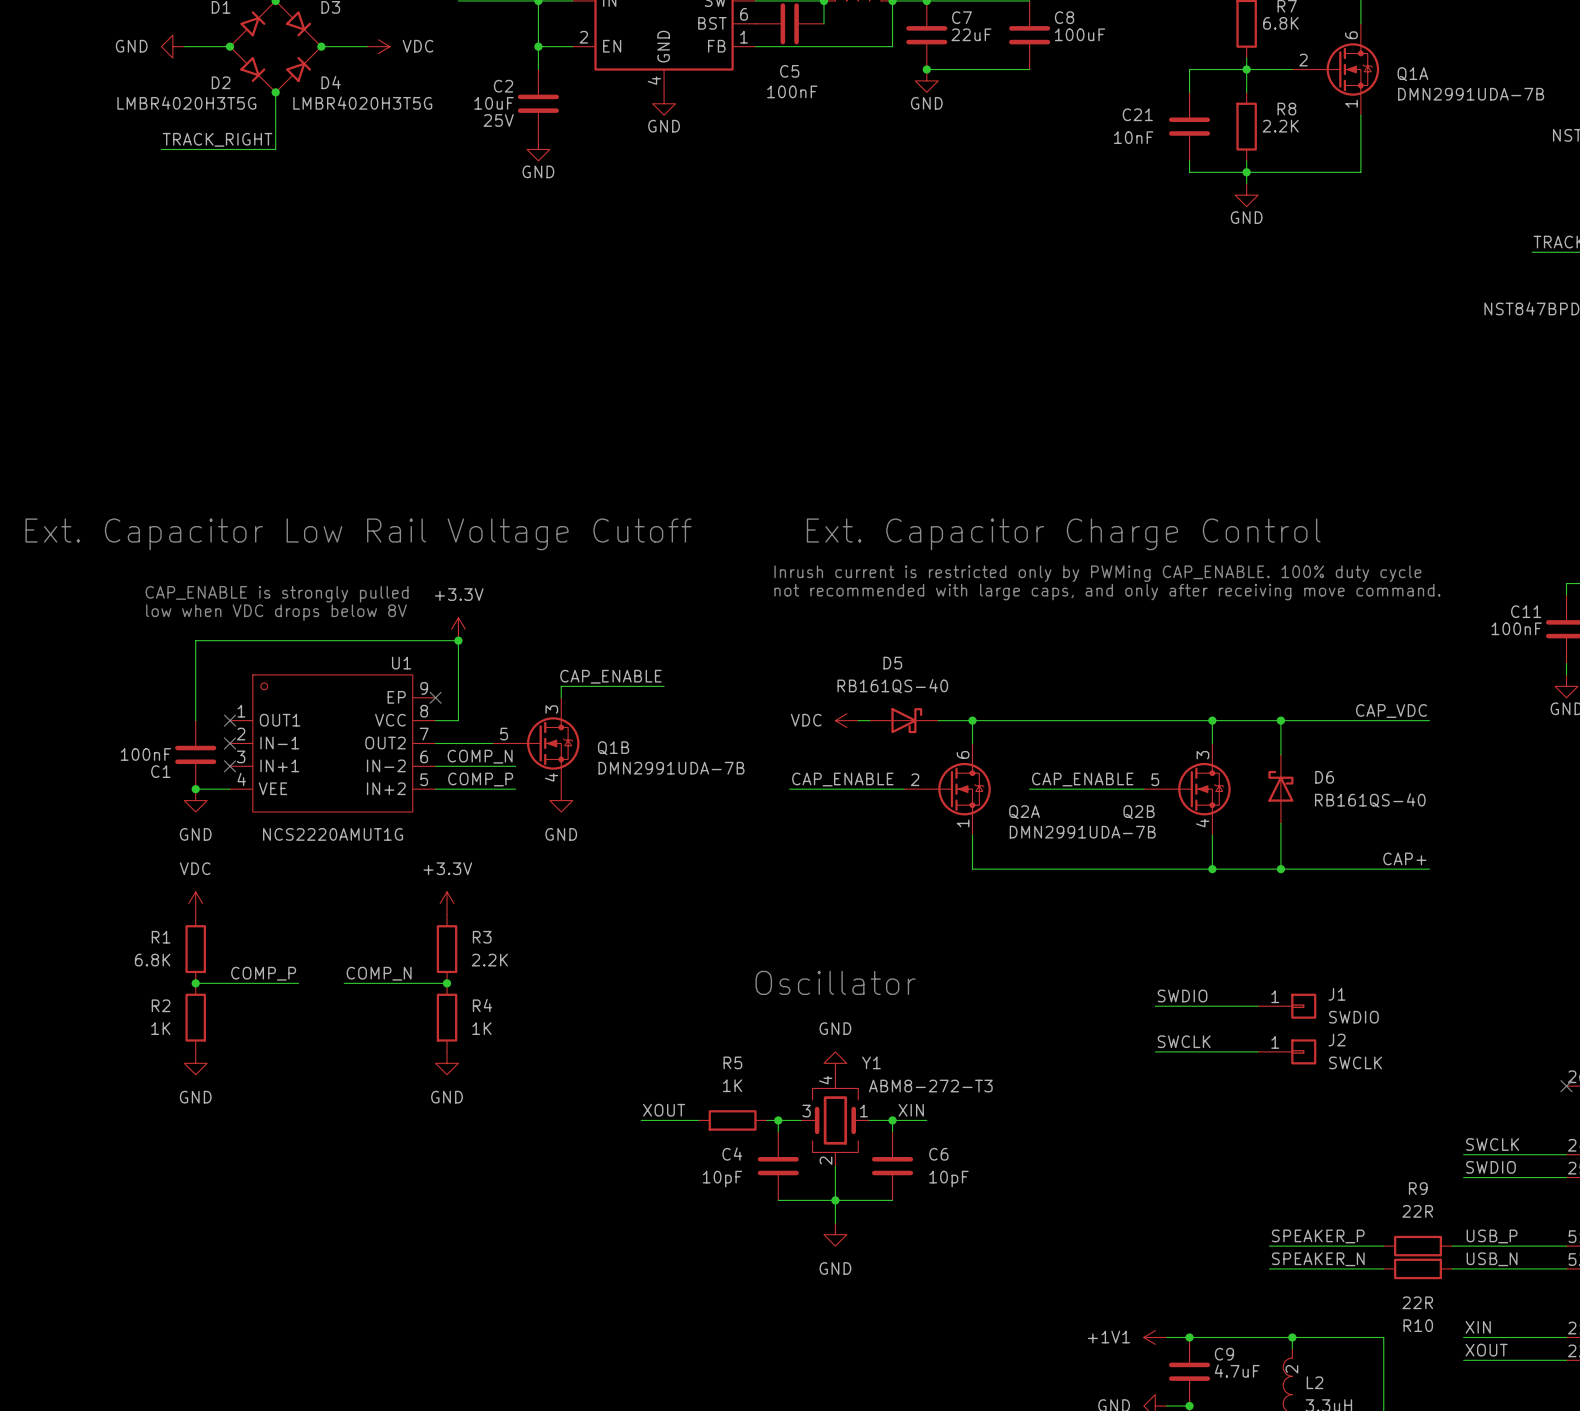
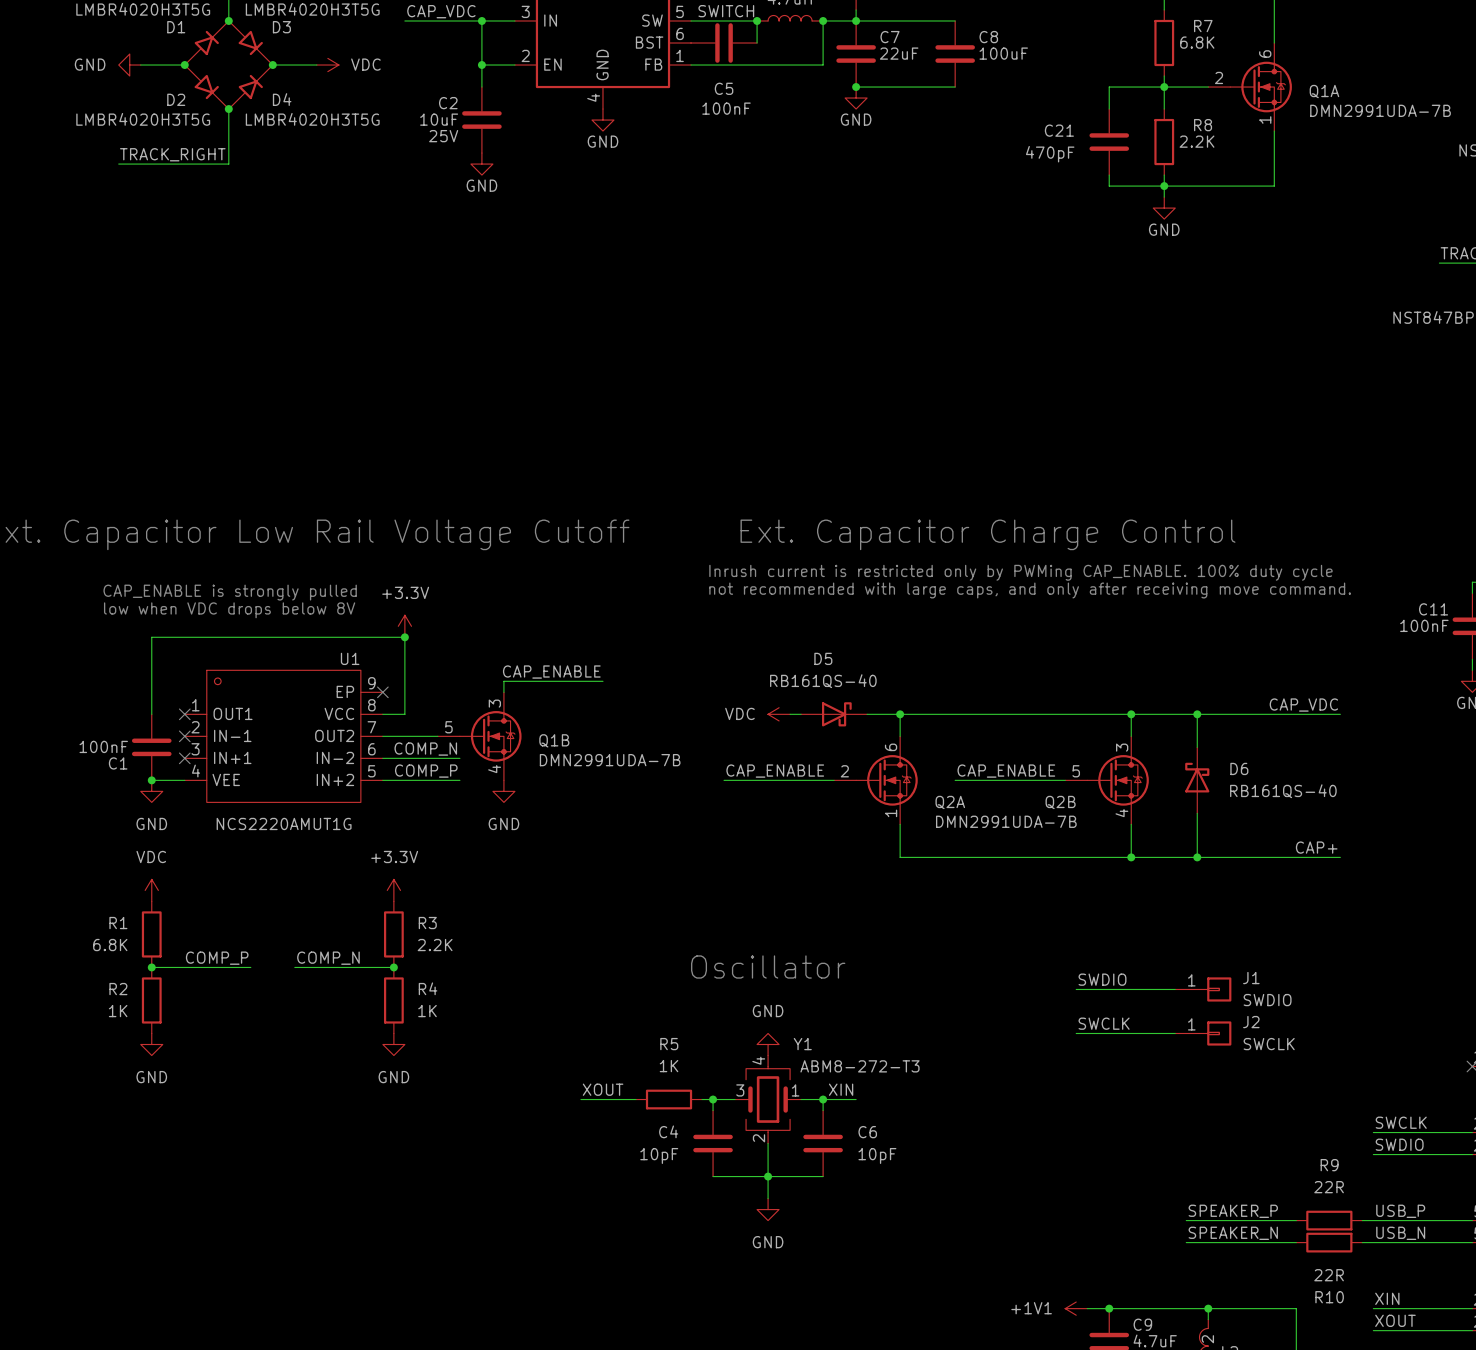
C21 value: 10nF (1133, 137) -> 470pF (1050, 154)

